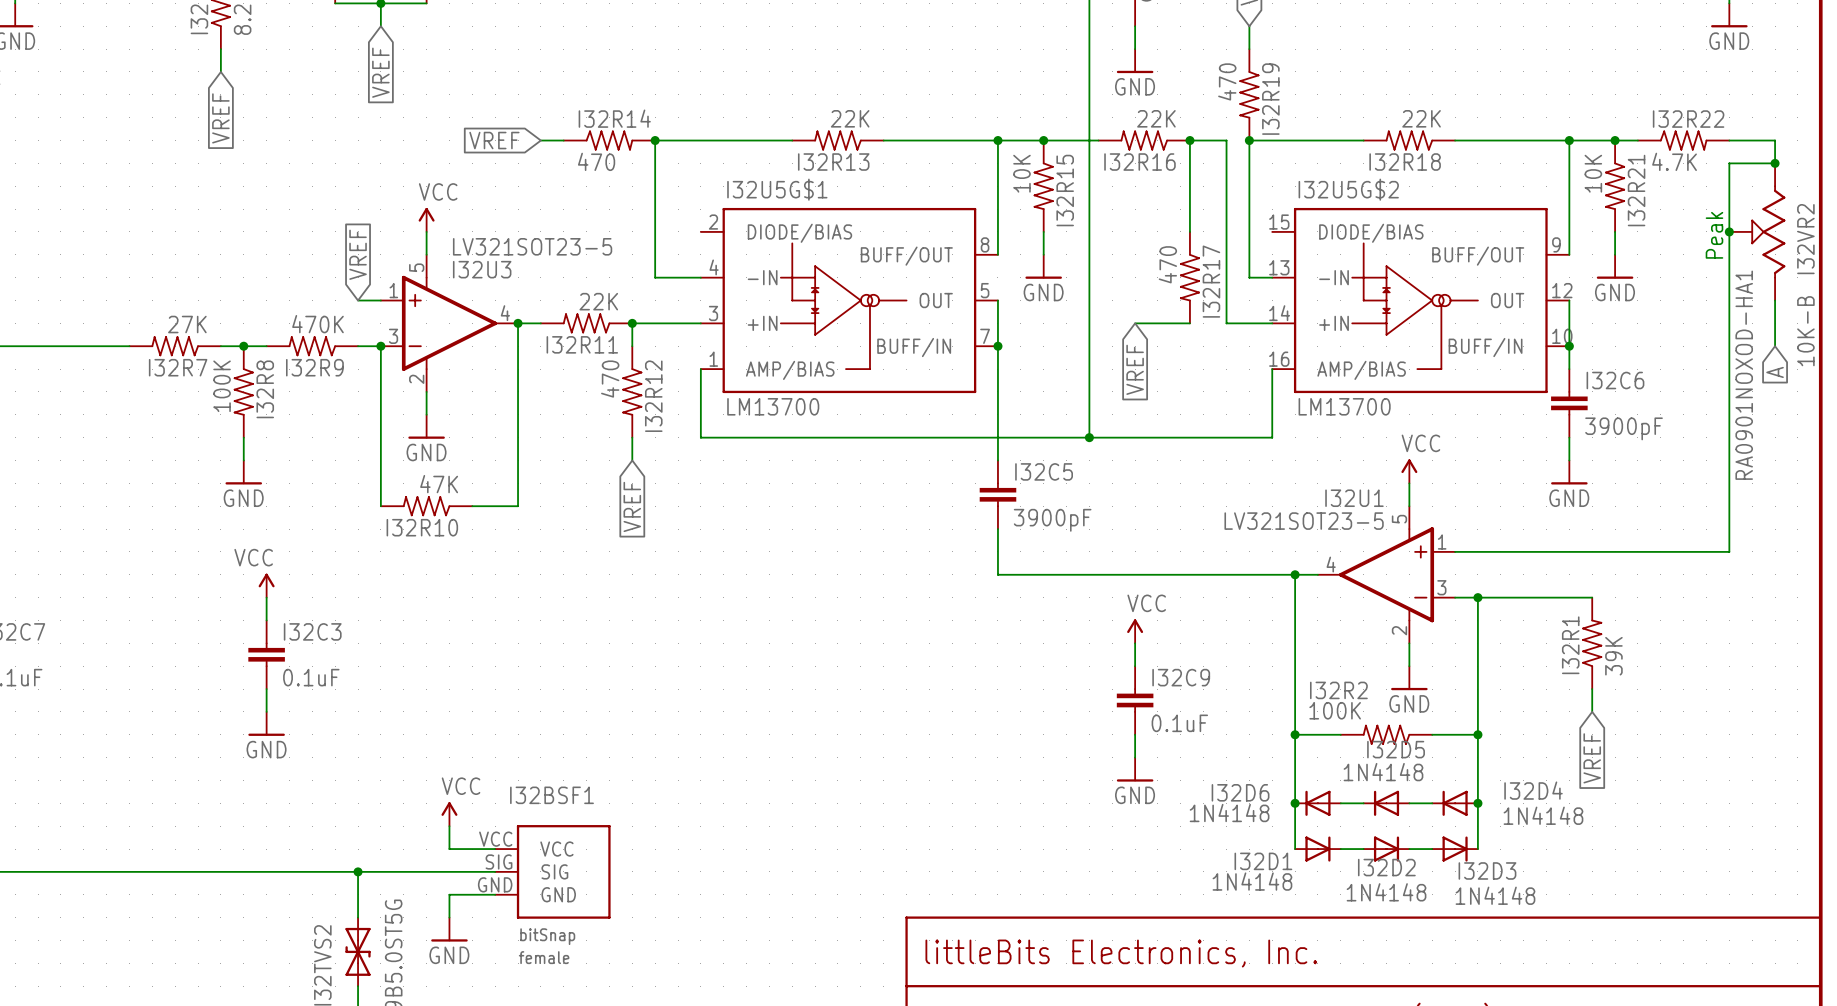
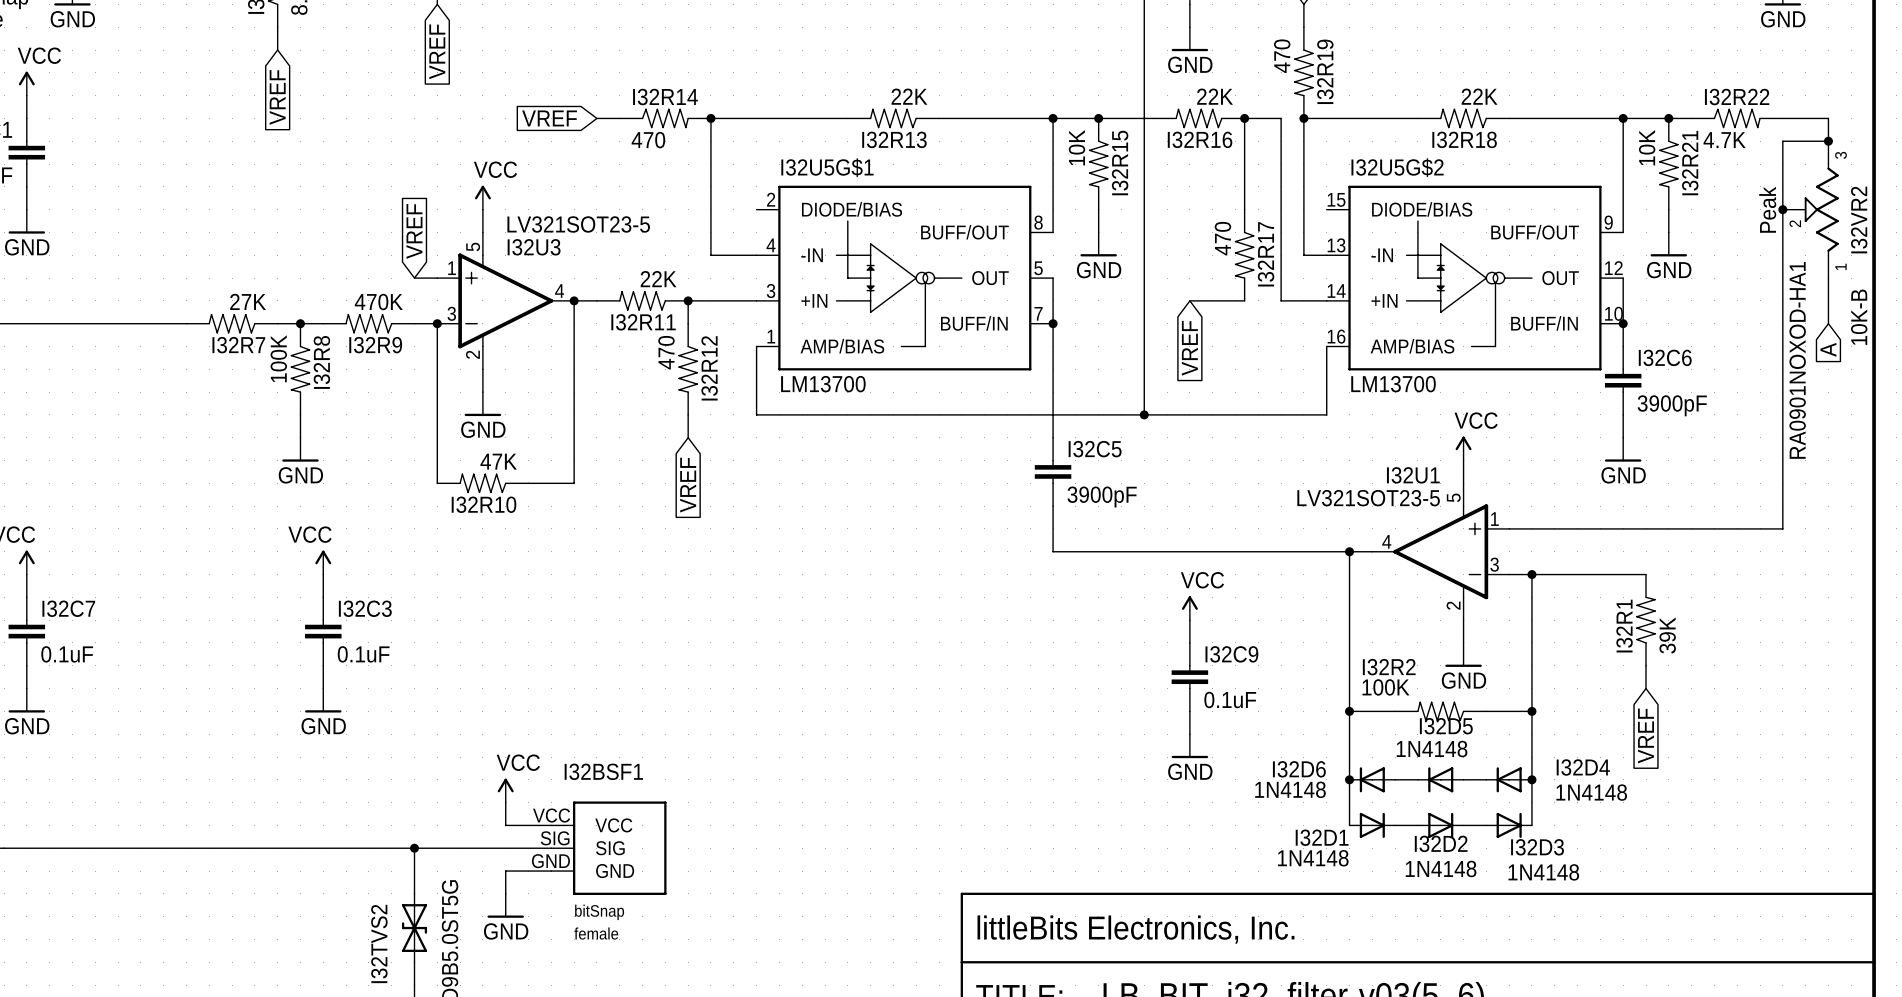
I32VR2 text: none -> 3 (1840, 155)
I32VR2 text: none -> 2 (1795, 223)
I32VR2 text: none -> 1 (1840, 266)

